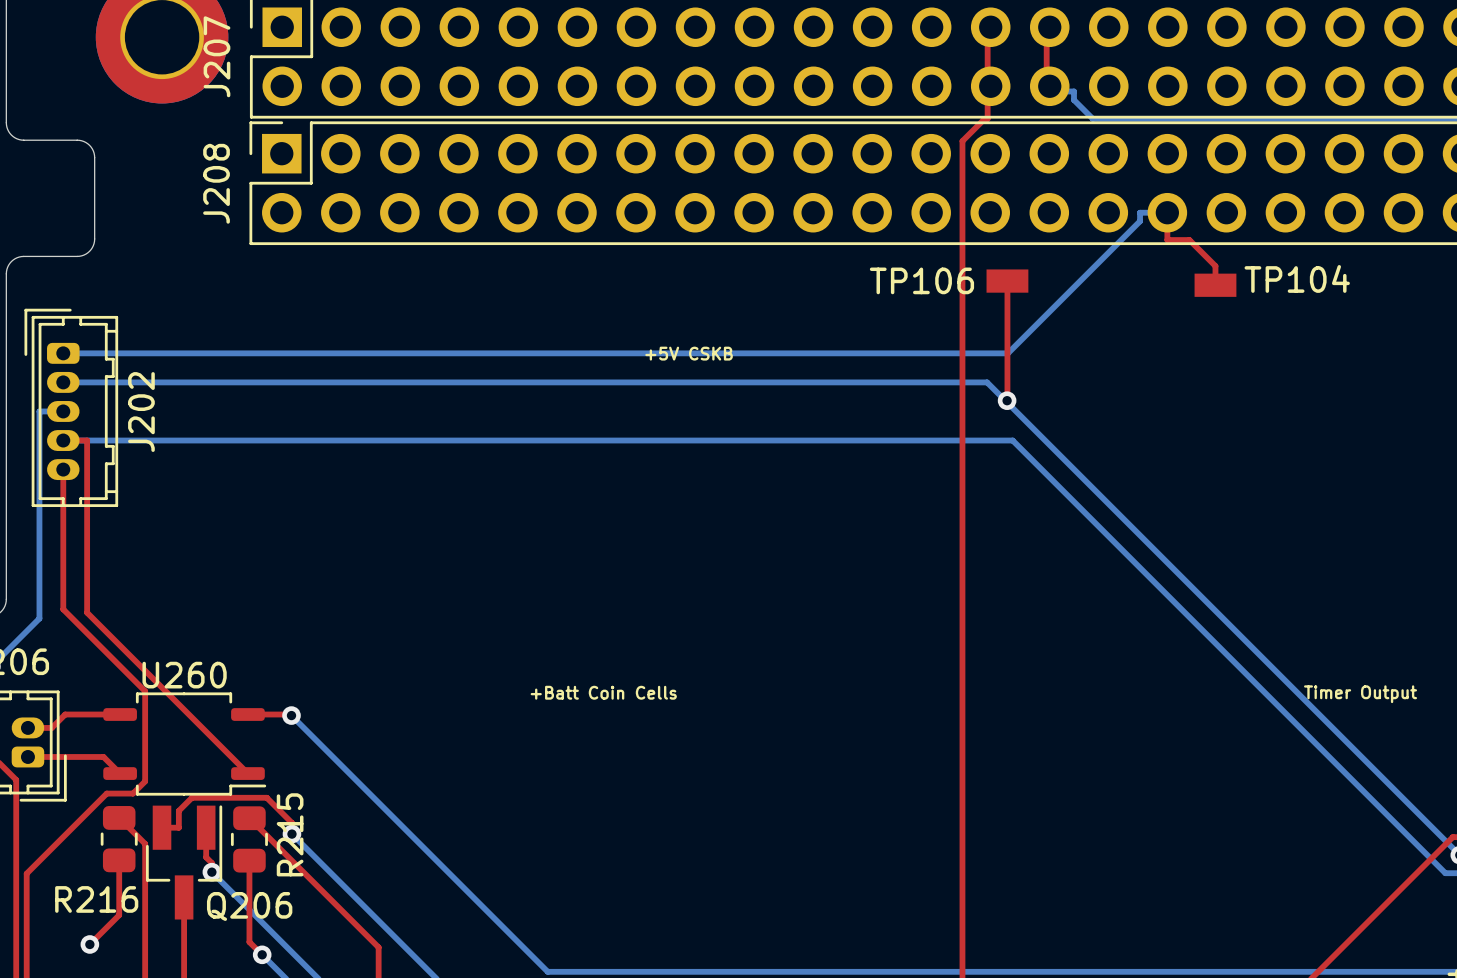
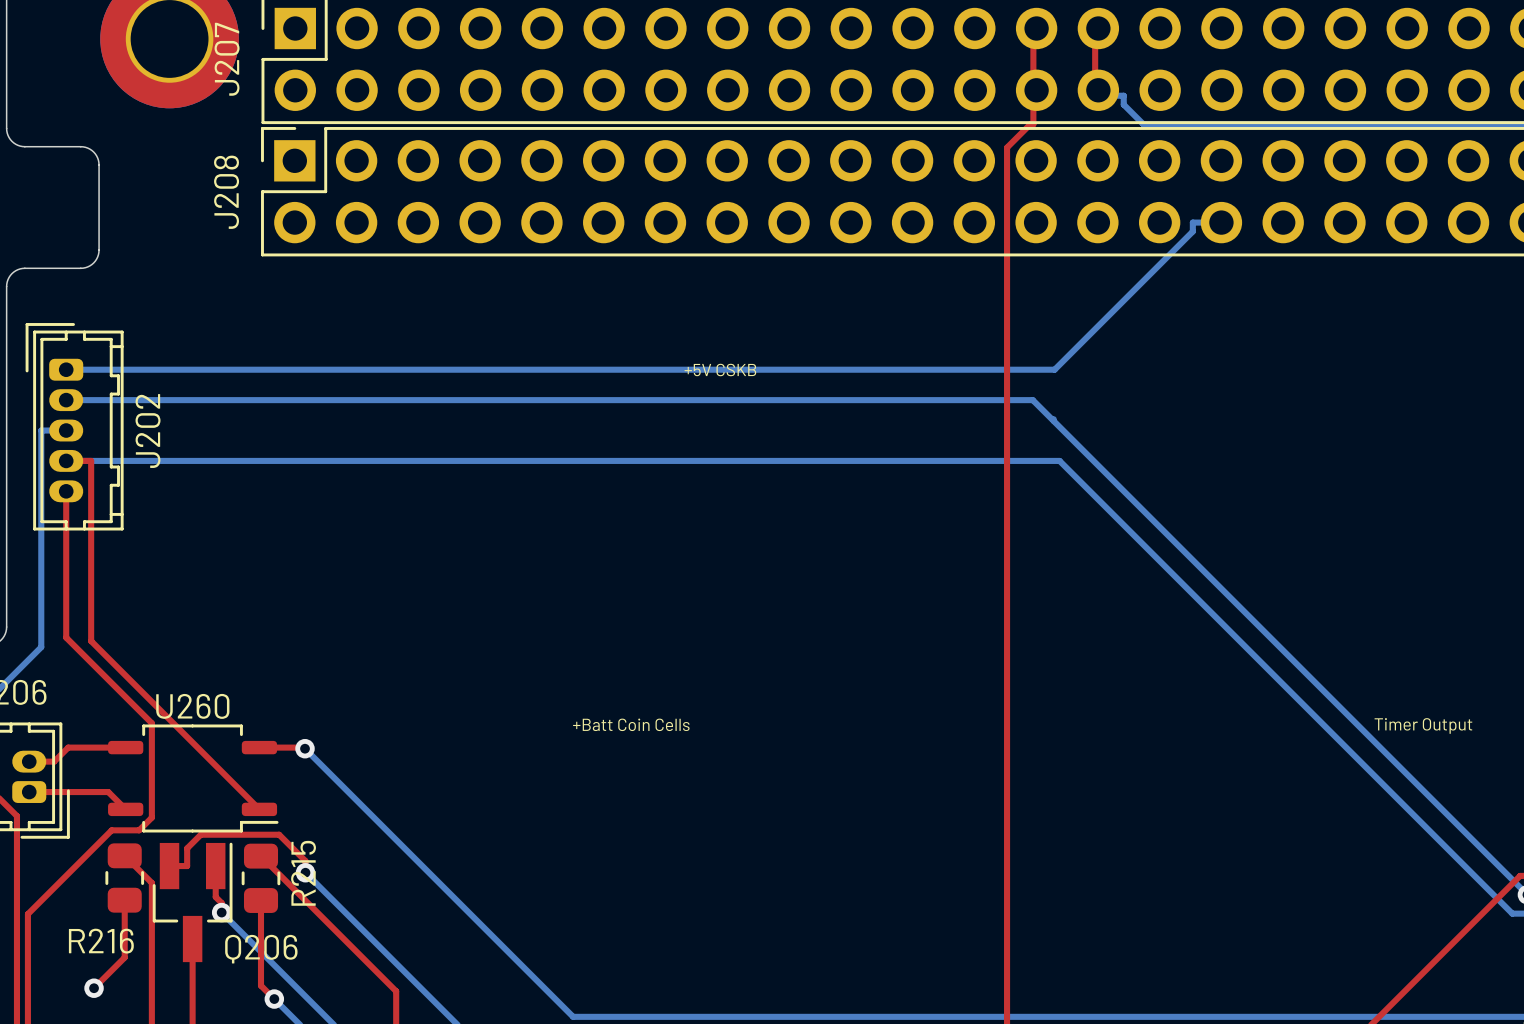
top track: (1167, 212) (1167, 240) (1189, 240) (1215, 266) (1215, 285) -> none
top track: (1007, 281) (1007, 400) -> none
TP106: (1007, 281) -> none
TP104: (1215, 285) -> none
via: (1007, 400) -> none

